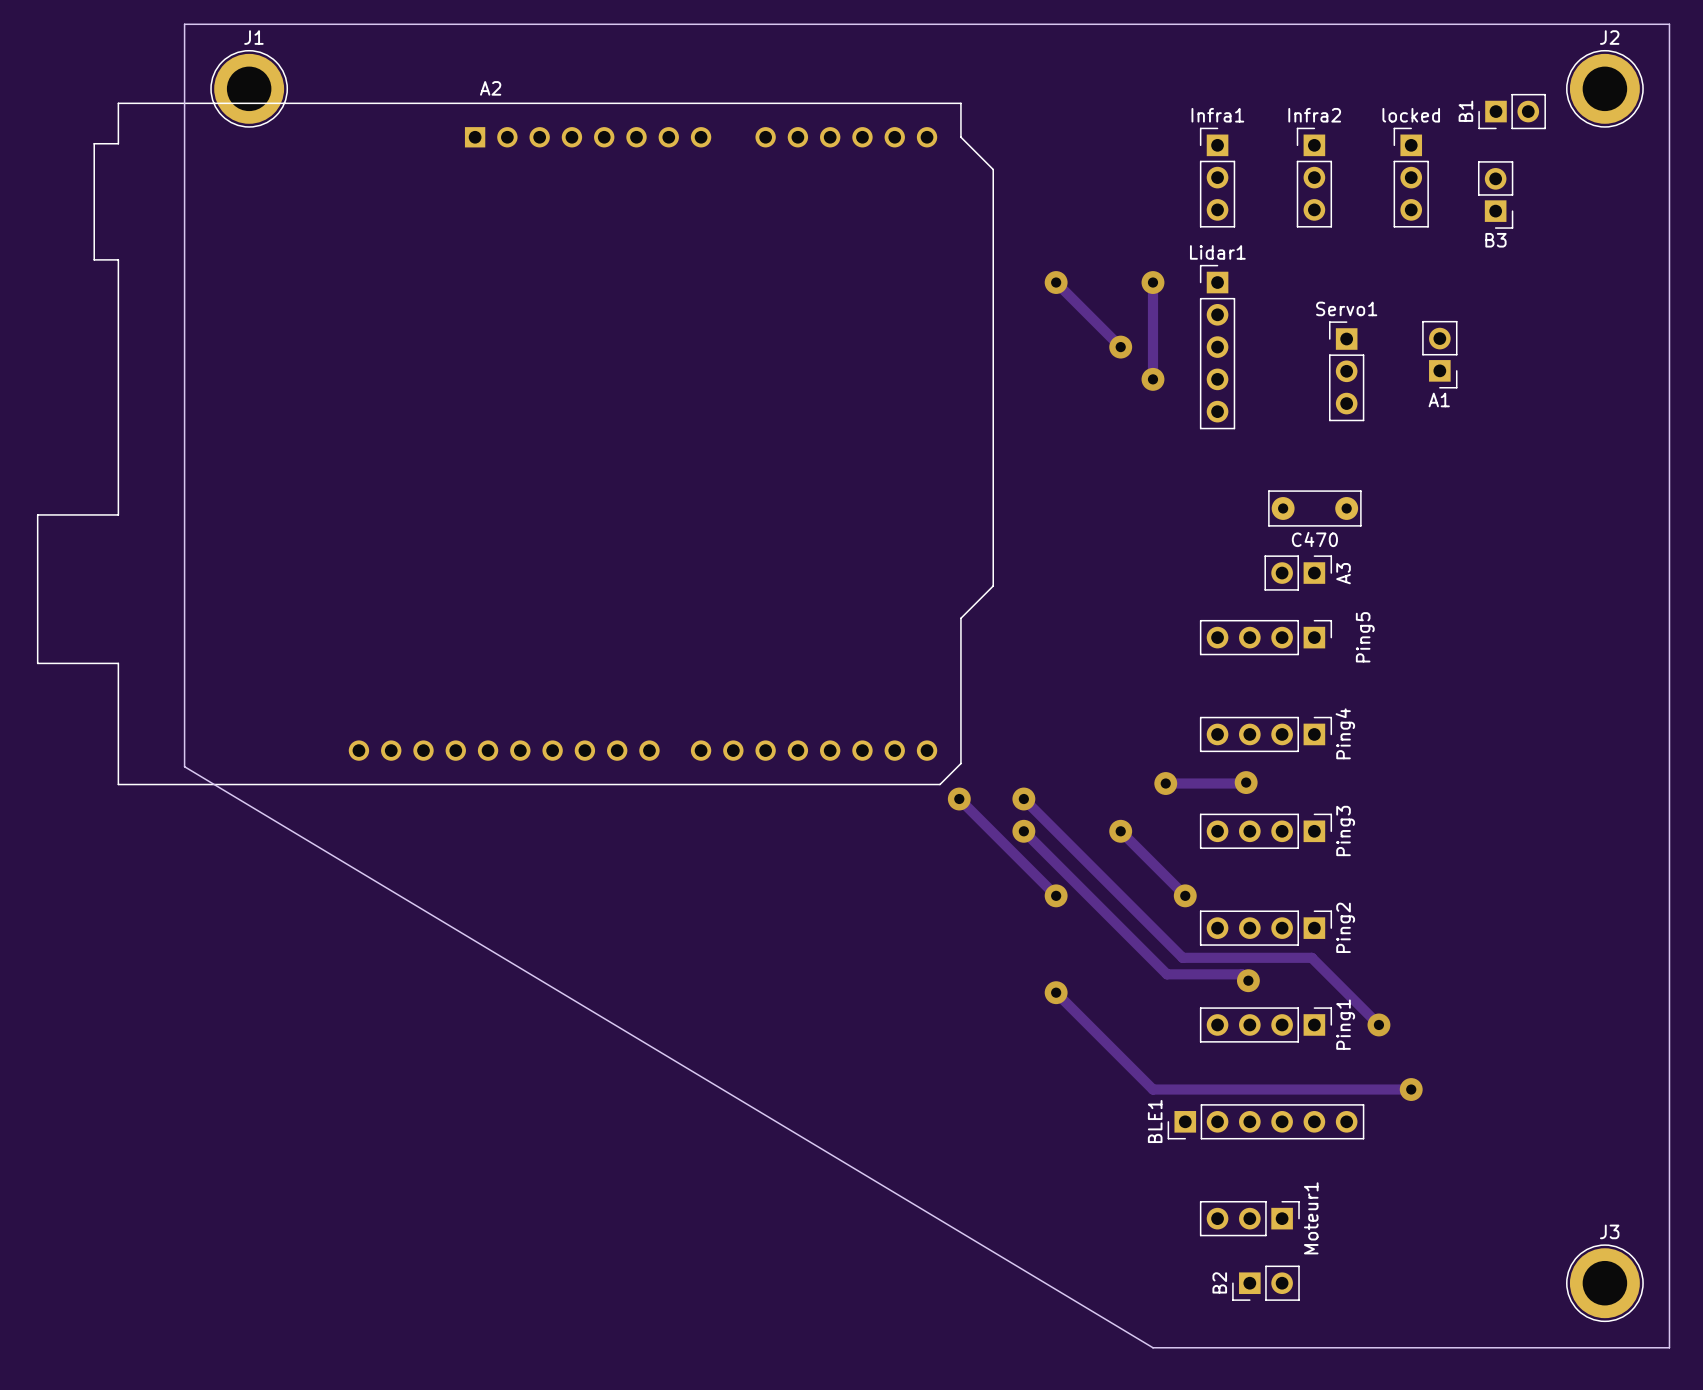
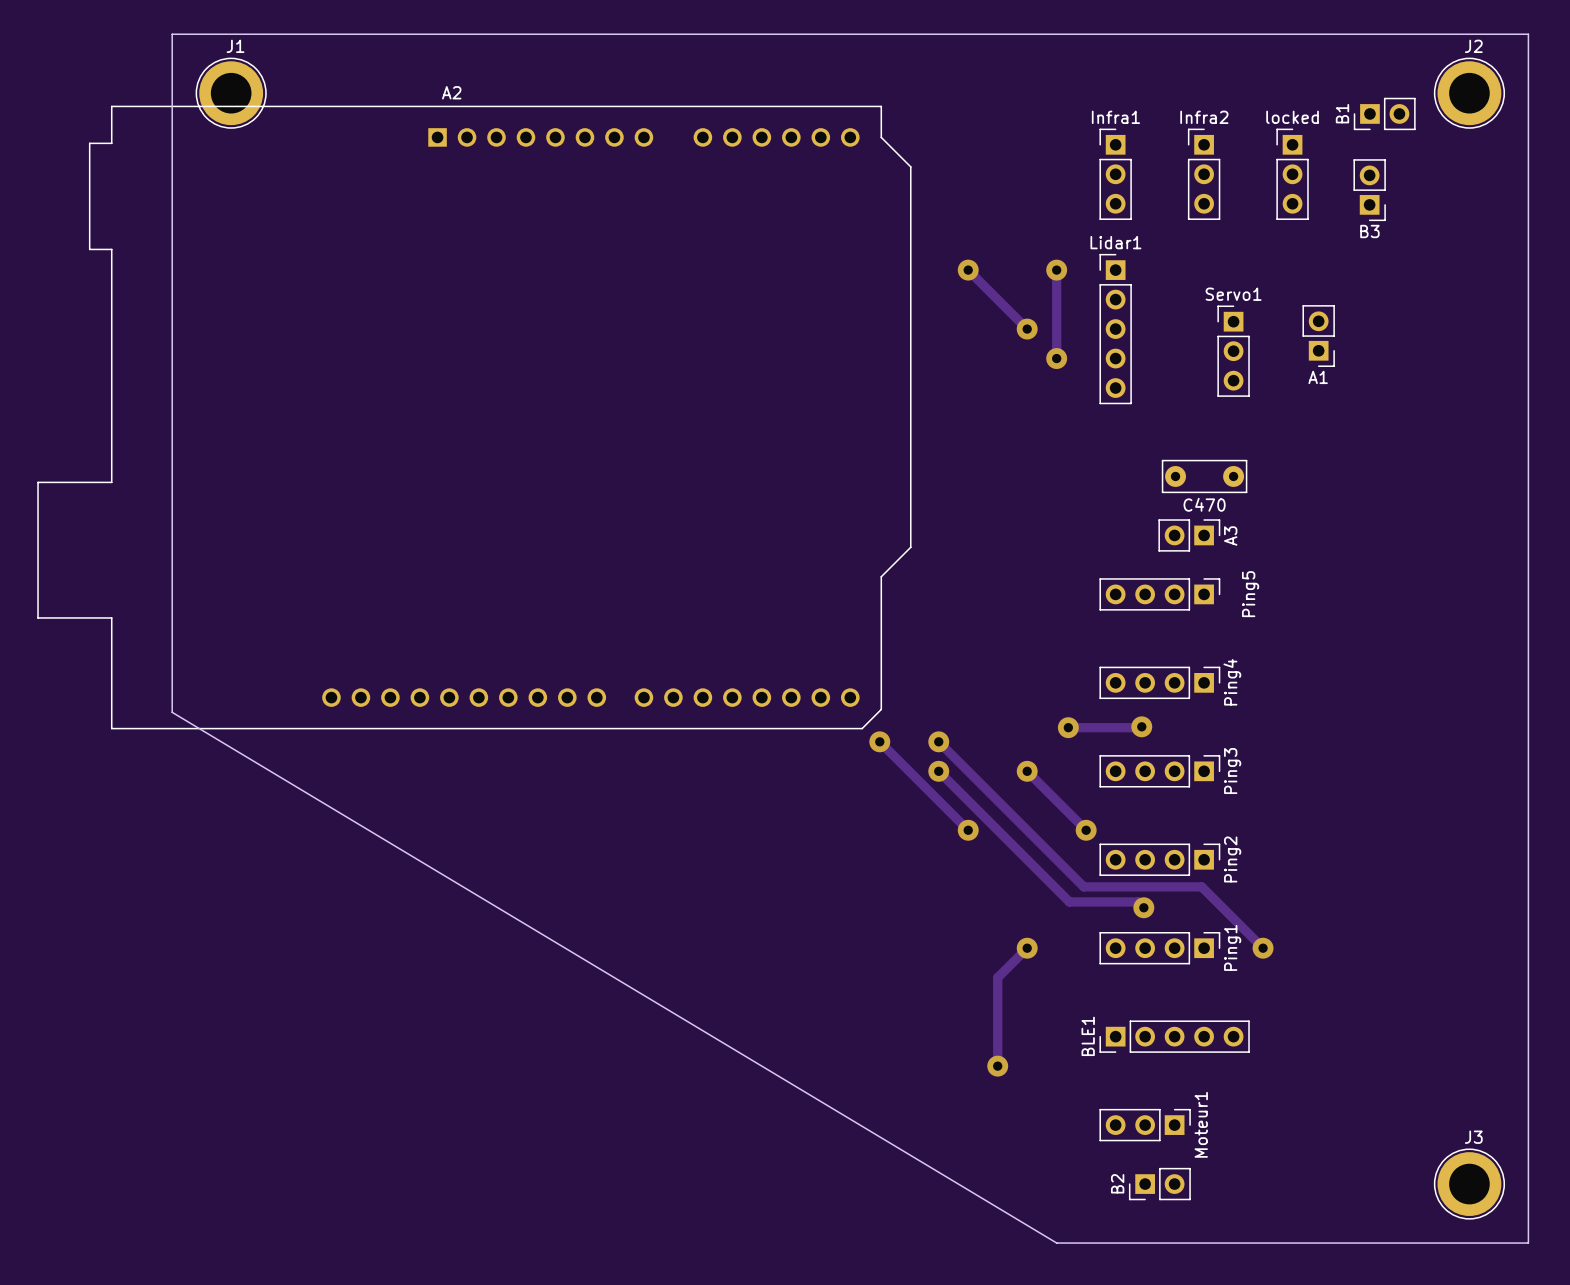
track: (1056, 992) (1152, 1089) (1411, 1089) -> none
via position: (1056, 992) -> (1027, 948)
track: none -> (1027, 948) (997, 977) (997, 1066)
via: (1411, 1089) -> none
BLE1 footprint: [1167, 1104, 1365, 1140] -> [1099, 1020, 1250, 1053]
via: none -> (997, 1066)

